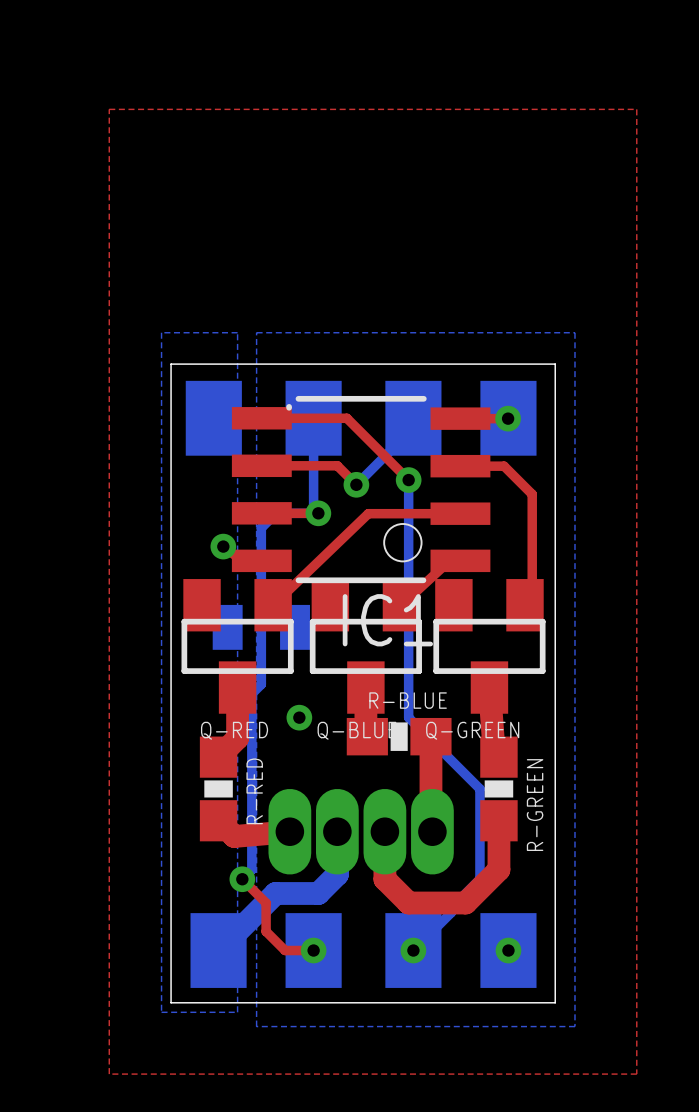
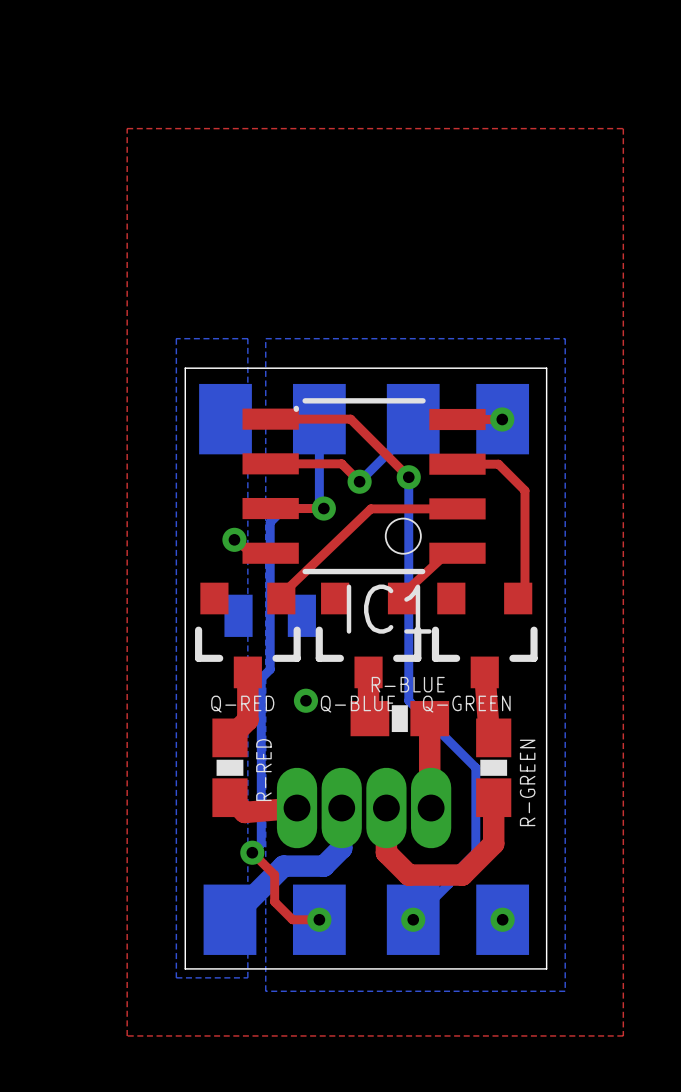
Q-RED footprint: [181, 579, 294, 714] -> [195, 582, 301, 689]
Q-BLUE footprint: [309, 579, 422, 714] -> [315, 582, 422, 689]
Q-GREEN footprint: [433, 579, 546, 714] -> [431, 582, 538, 689]

